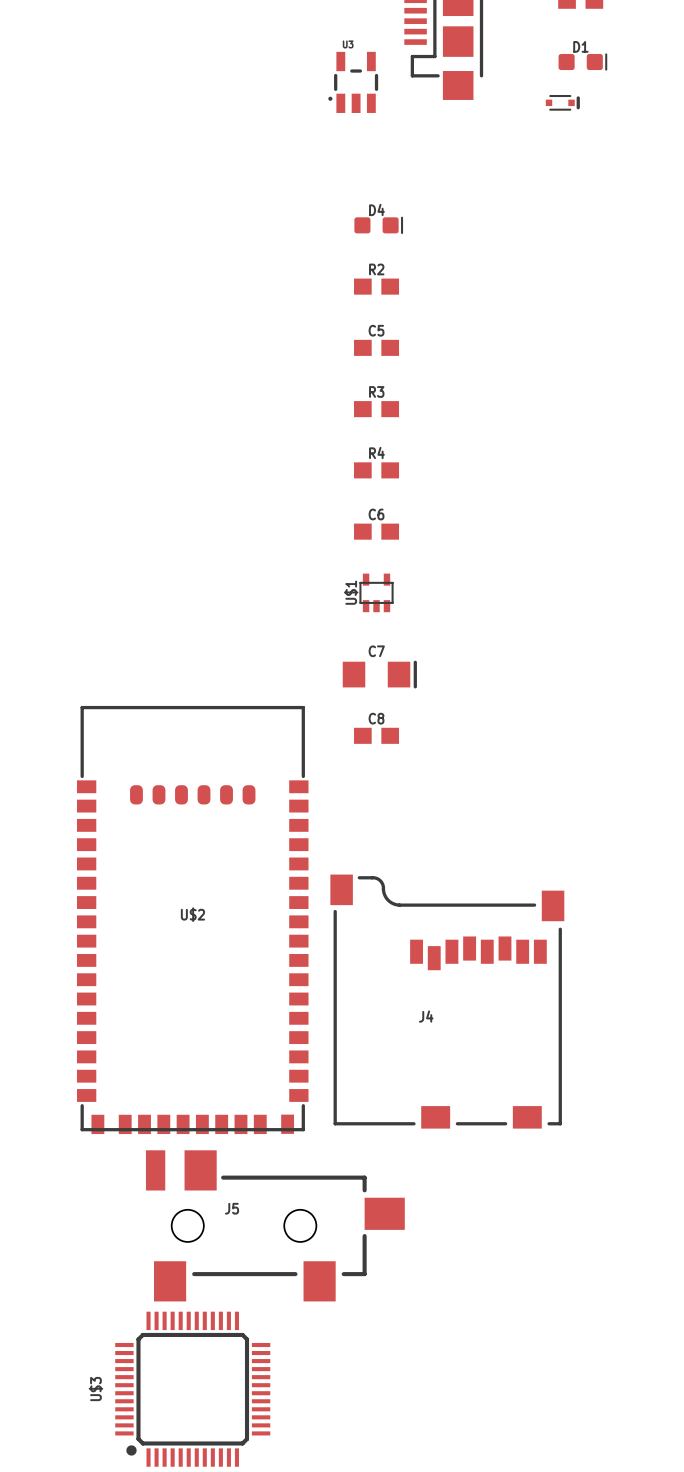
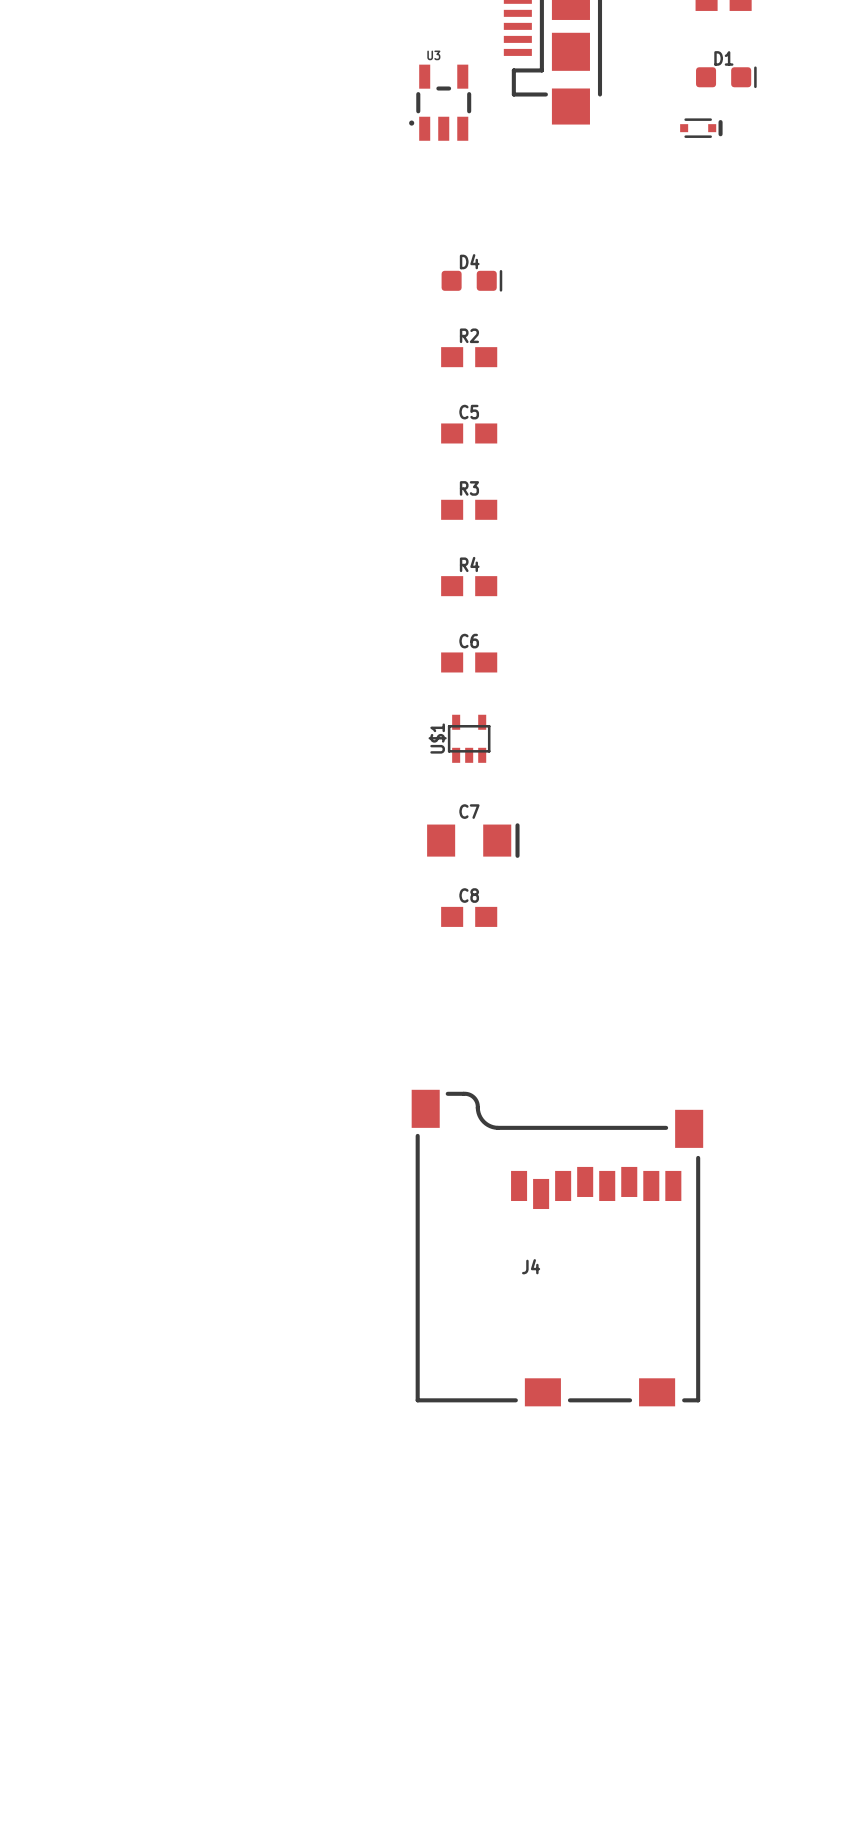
U$2: (192, 920) -> none
J5: (275, 1225) -> none
U$3: (192, 1389) -> none

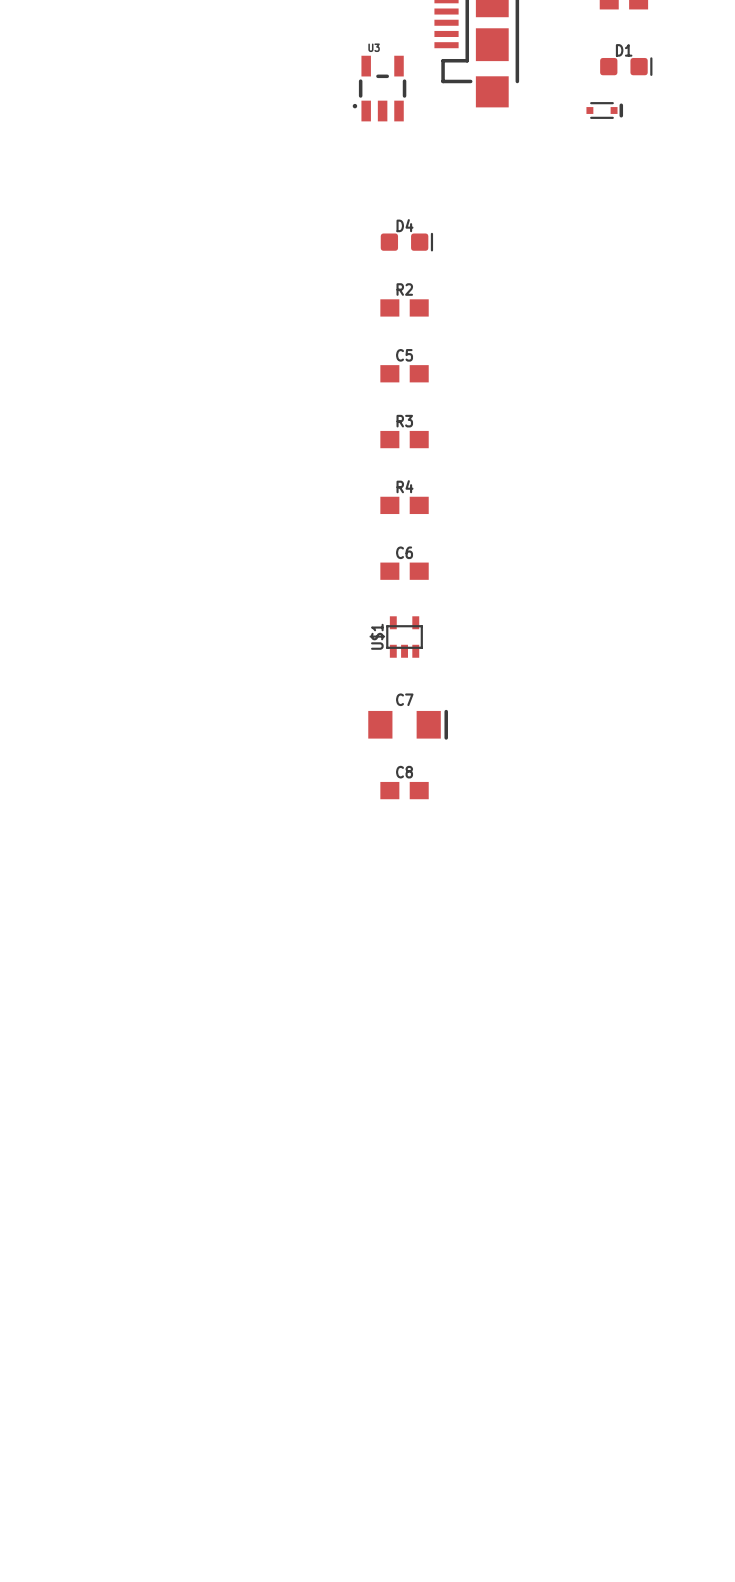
J4: (557, 1248) -> none

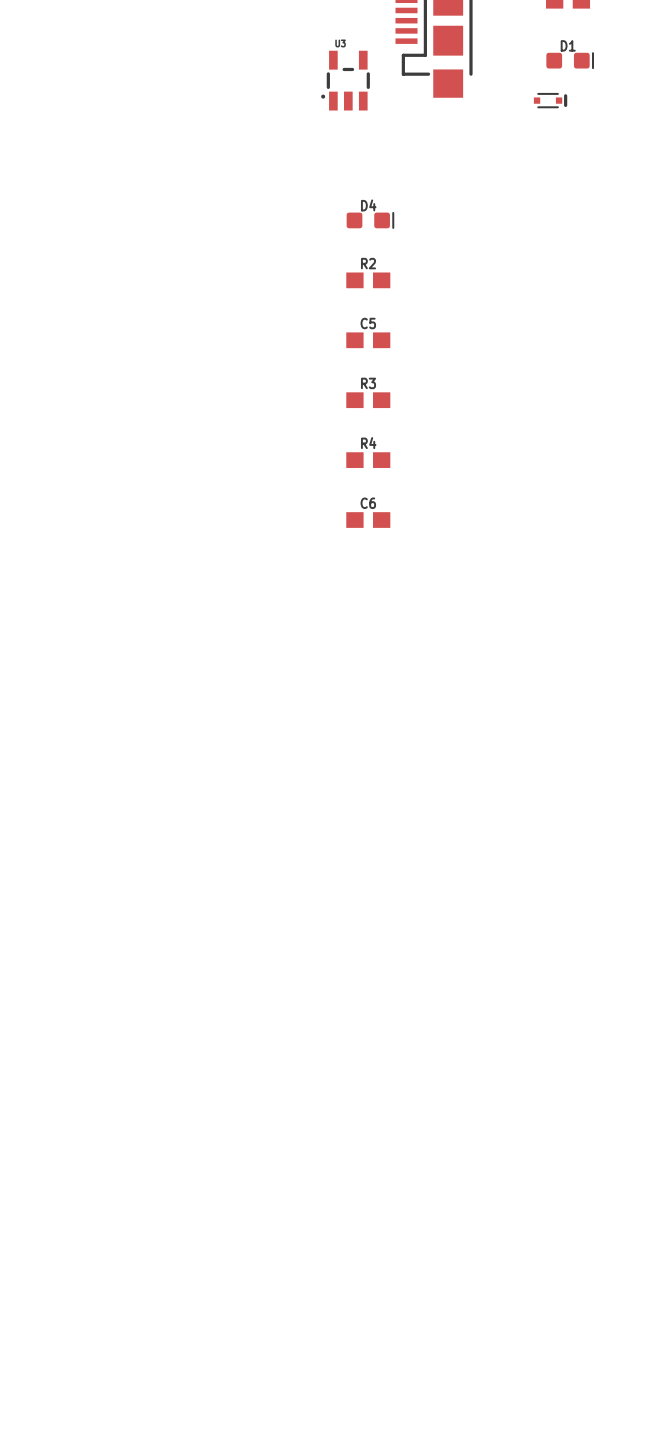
U$1: (404, 637) -> none
C7: (408, 724) -> none
C8: (404, 790) -> none

